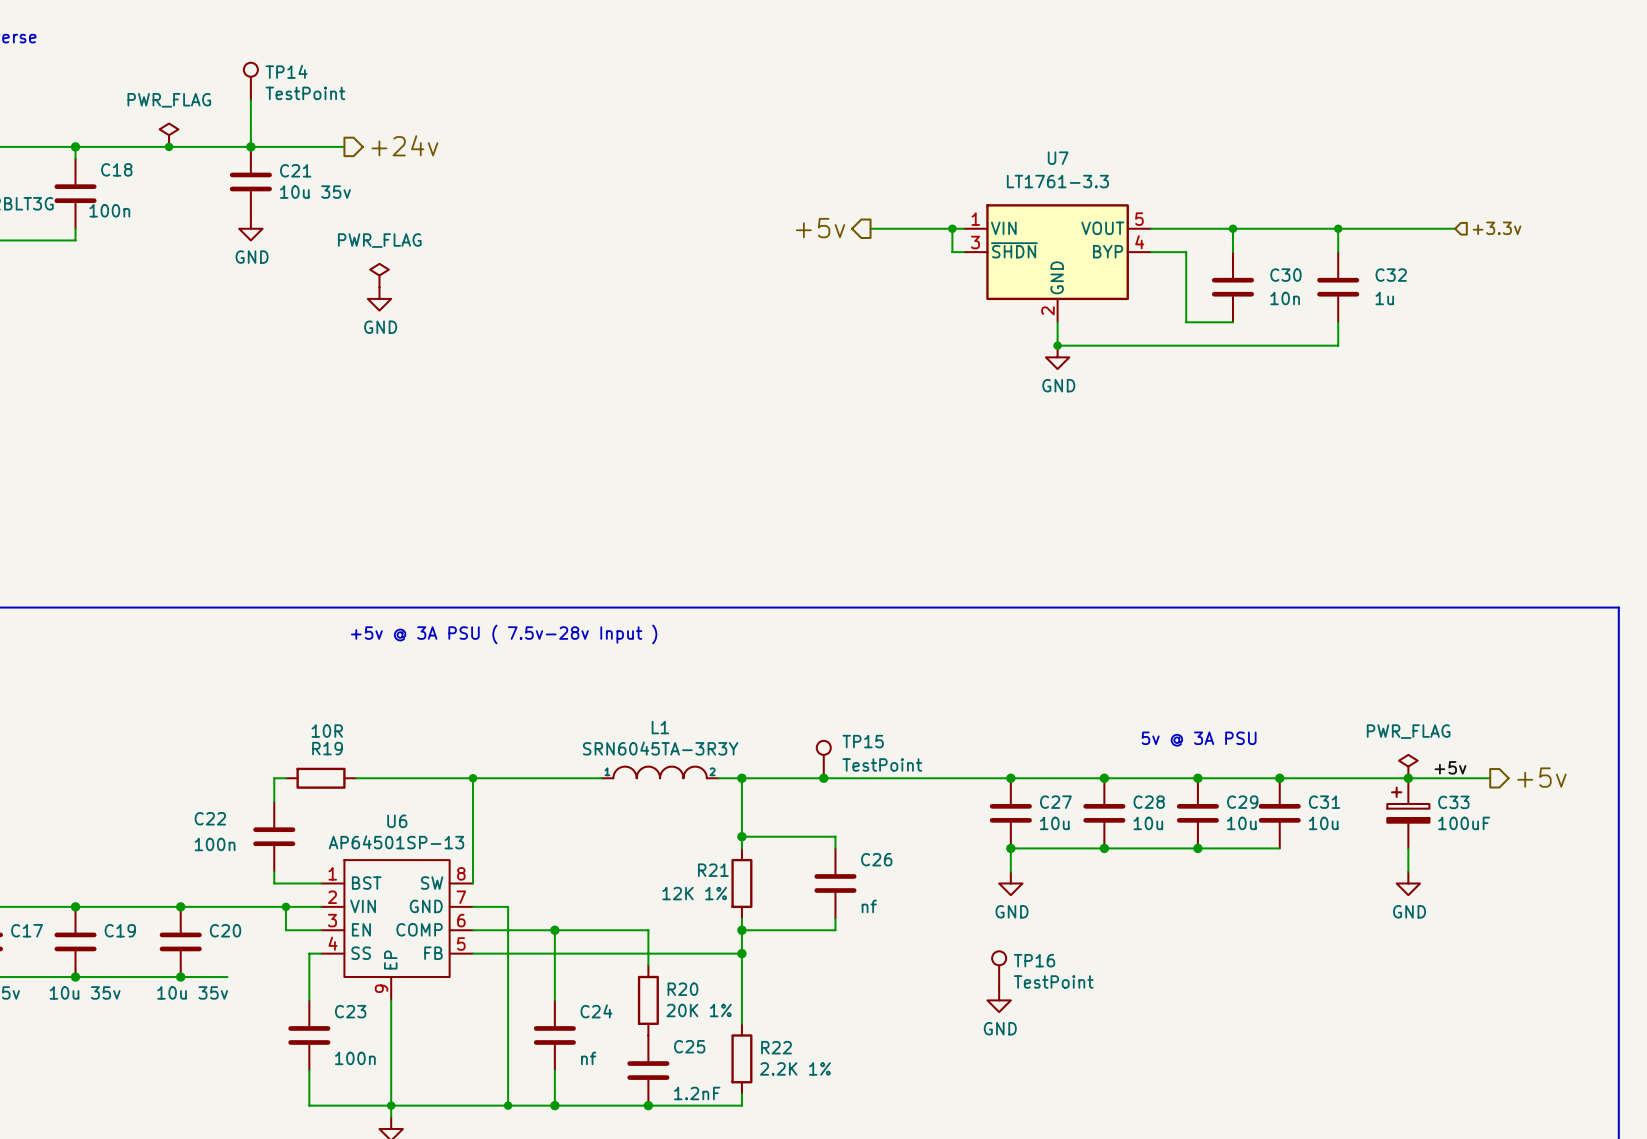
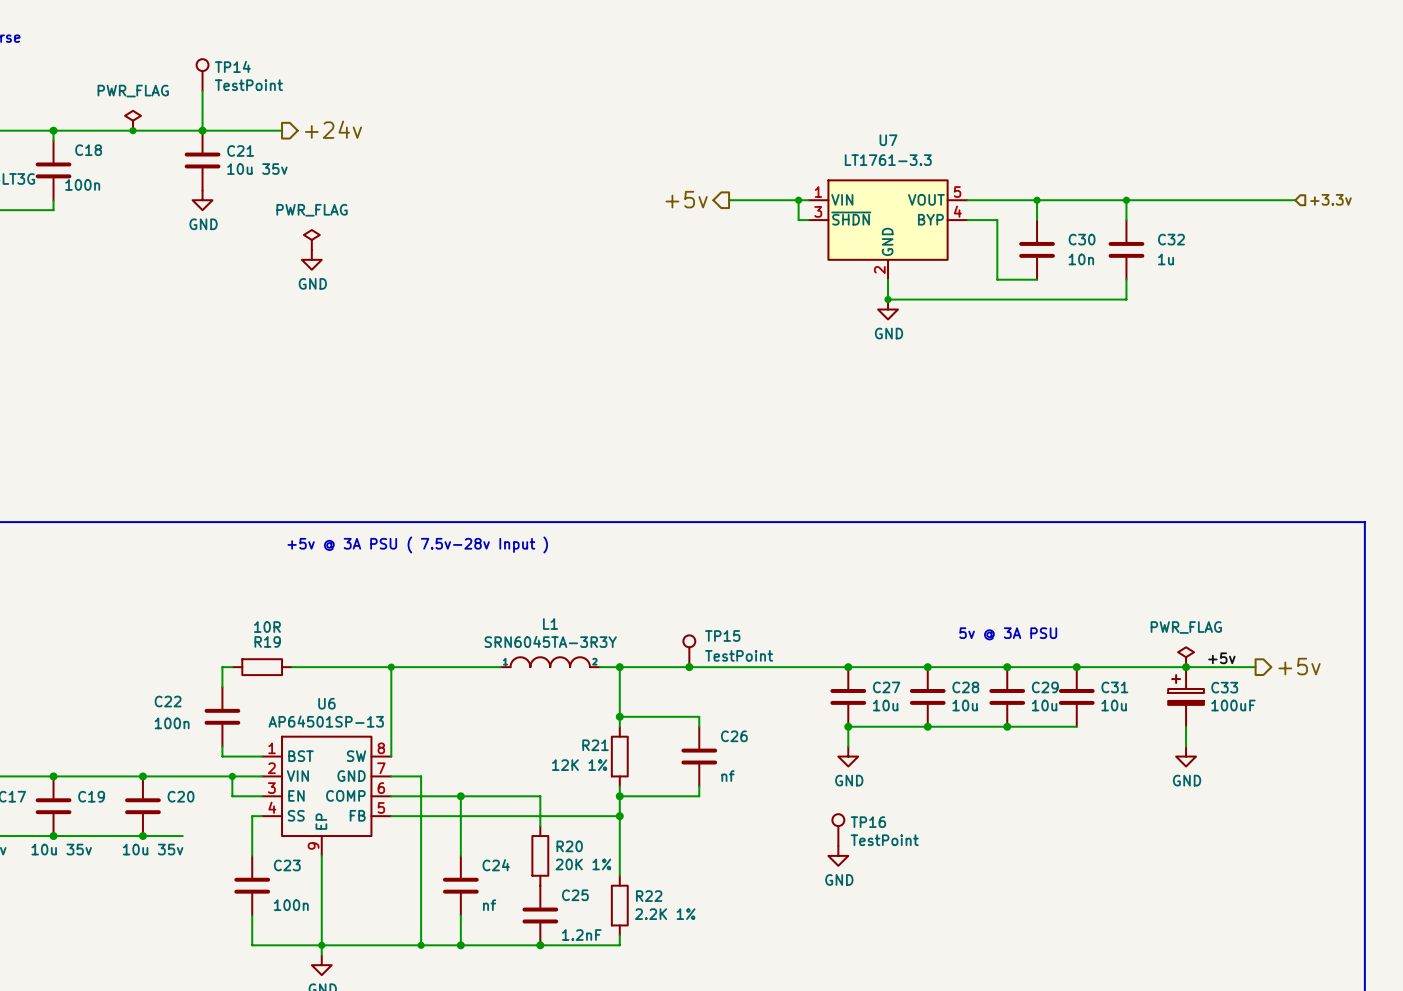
wire: none -> (1225, 200) (1295, 200)
hierarchical label position: +3.3v (1497, 228) -> +3.3v (1330, 199)

